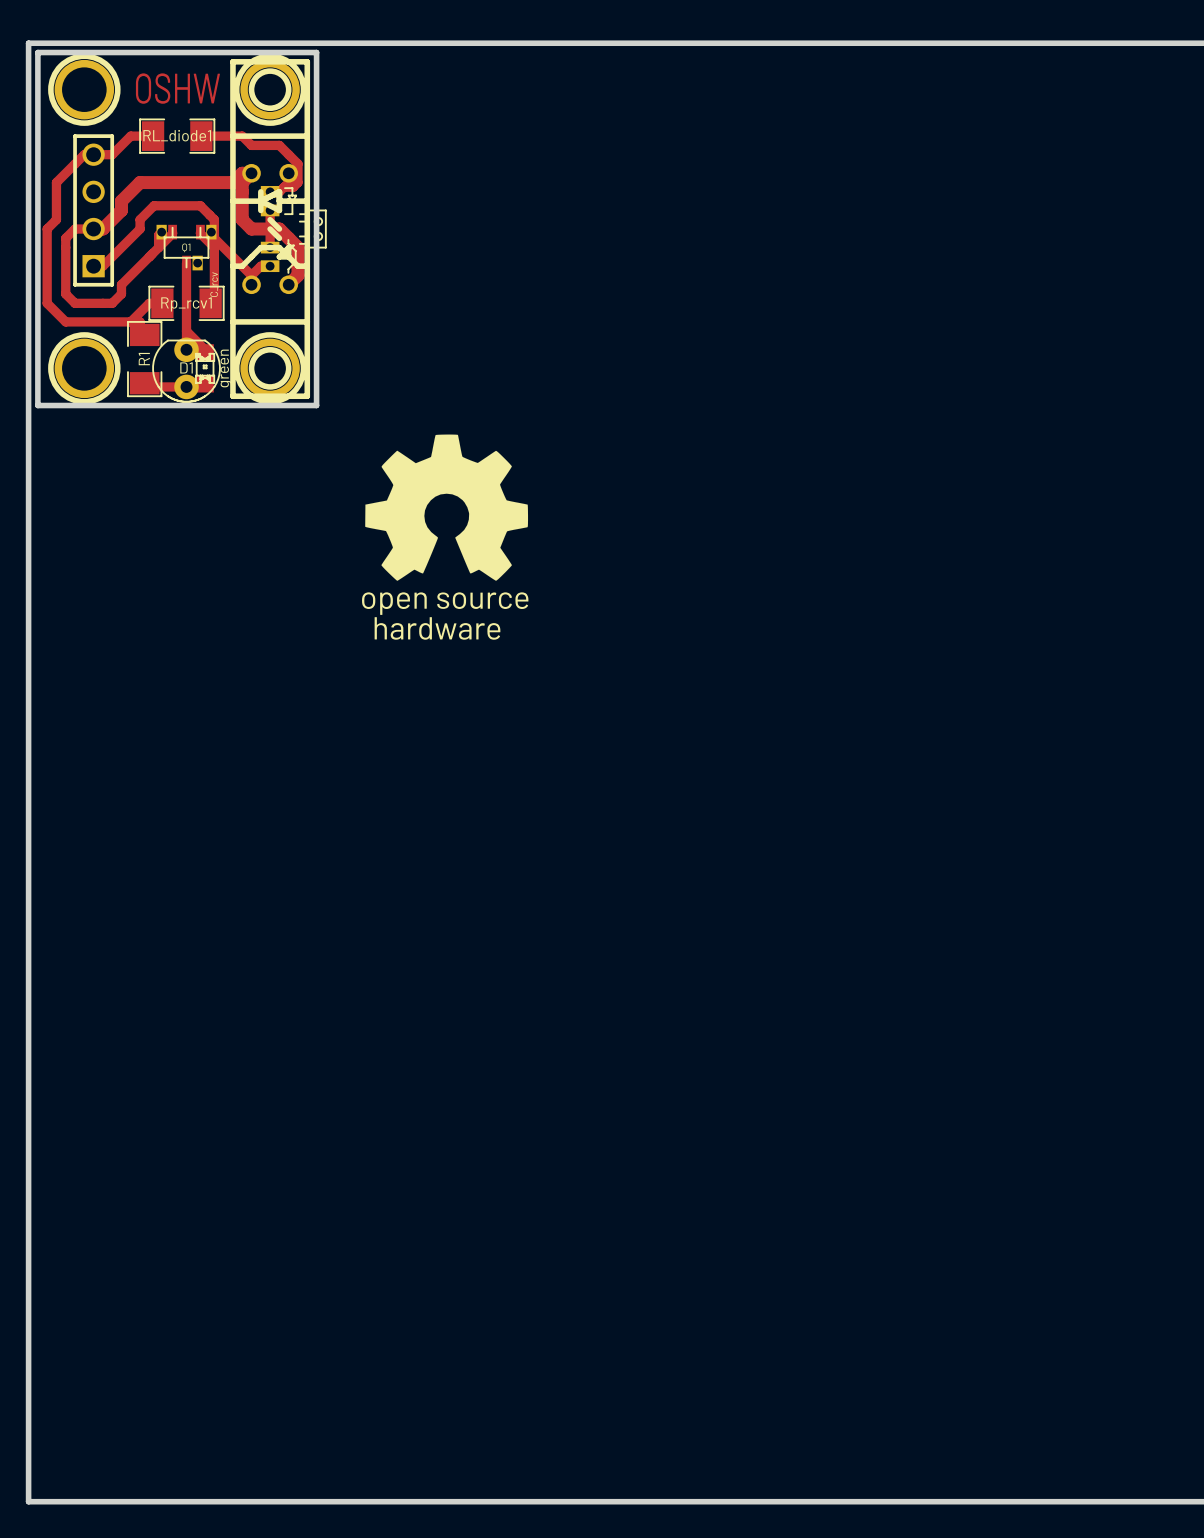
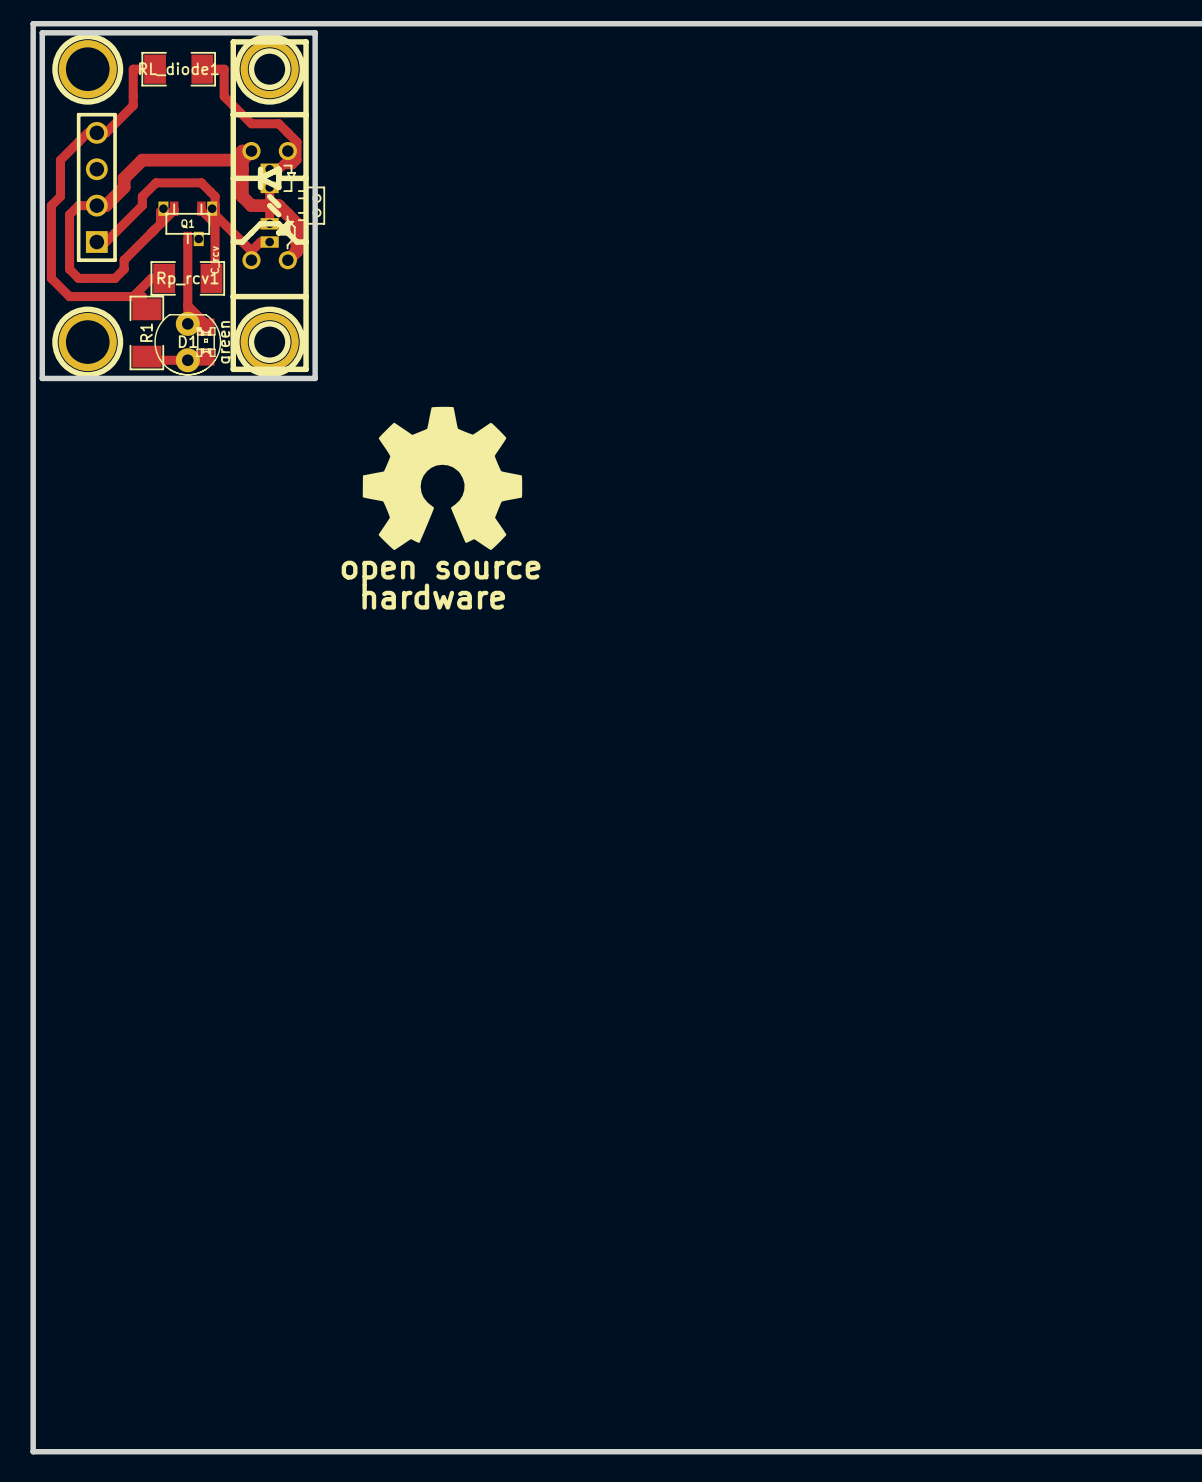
text: OSHW (177, 88) -> none
top track: (153, 136) (130, 136) (112, 154) (102, 154) -> (155, 69) (133, 69) (133, 105) (105, 132)
RL_diode1 position: (177, 136) -> (178, 69)
top track: (201, 136) (242, 136) -> (202, 69) (224, 69) (224, 96) (242, 114)

